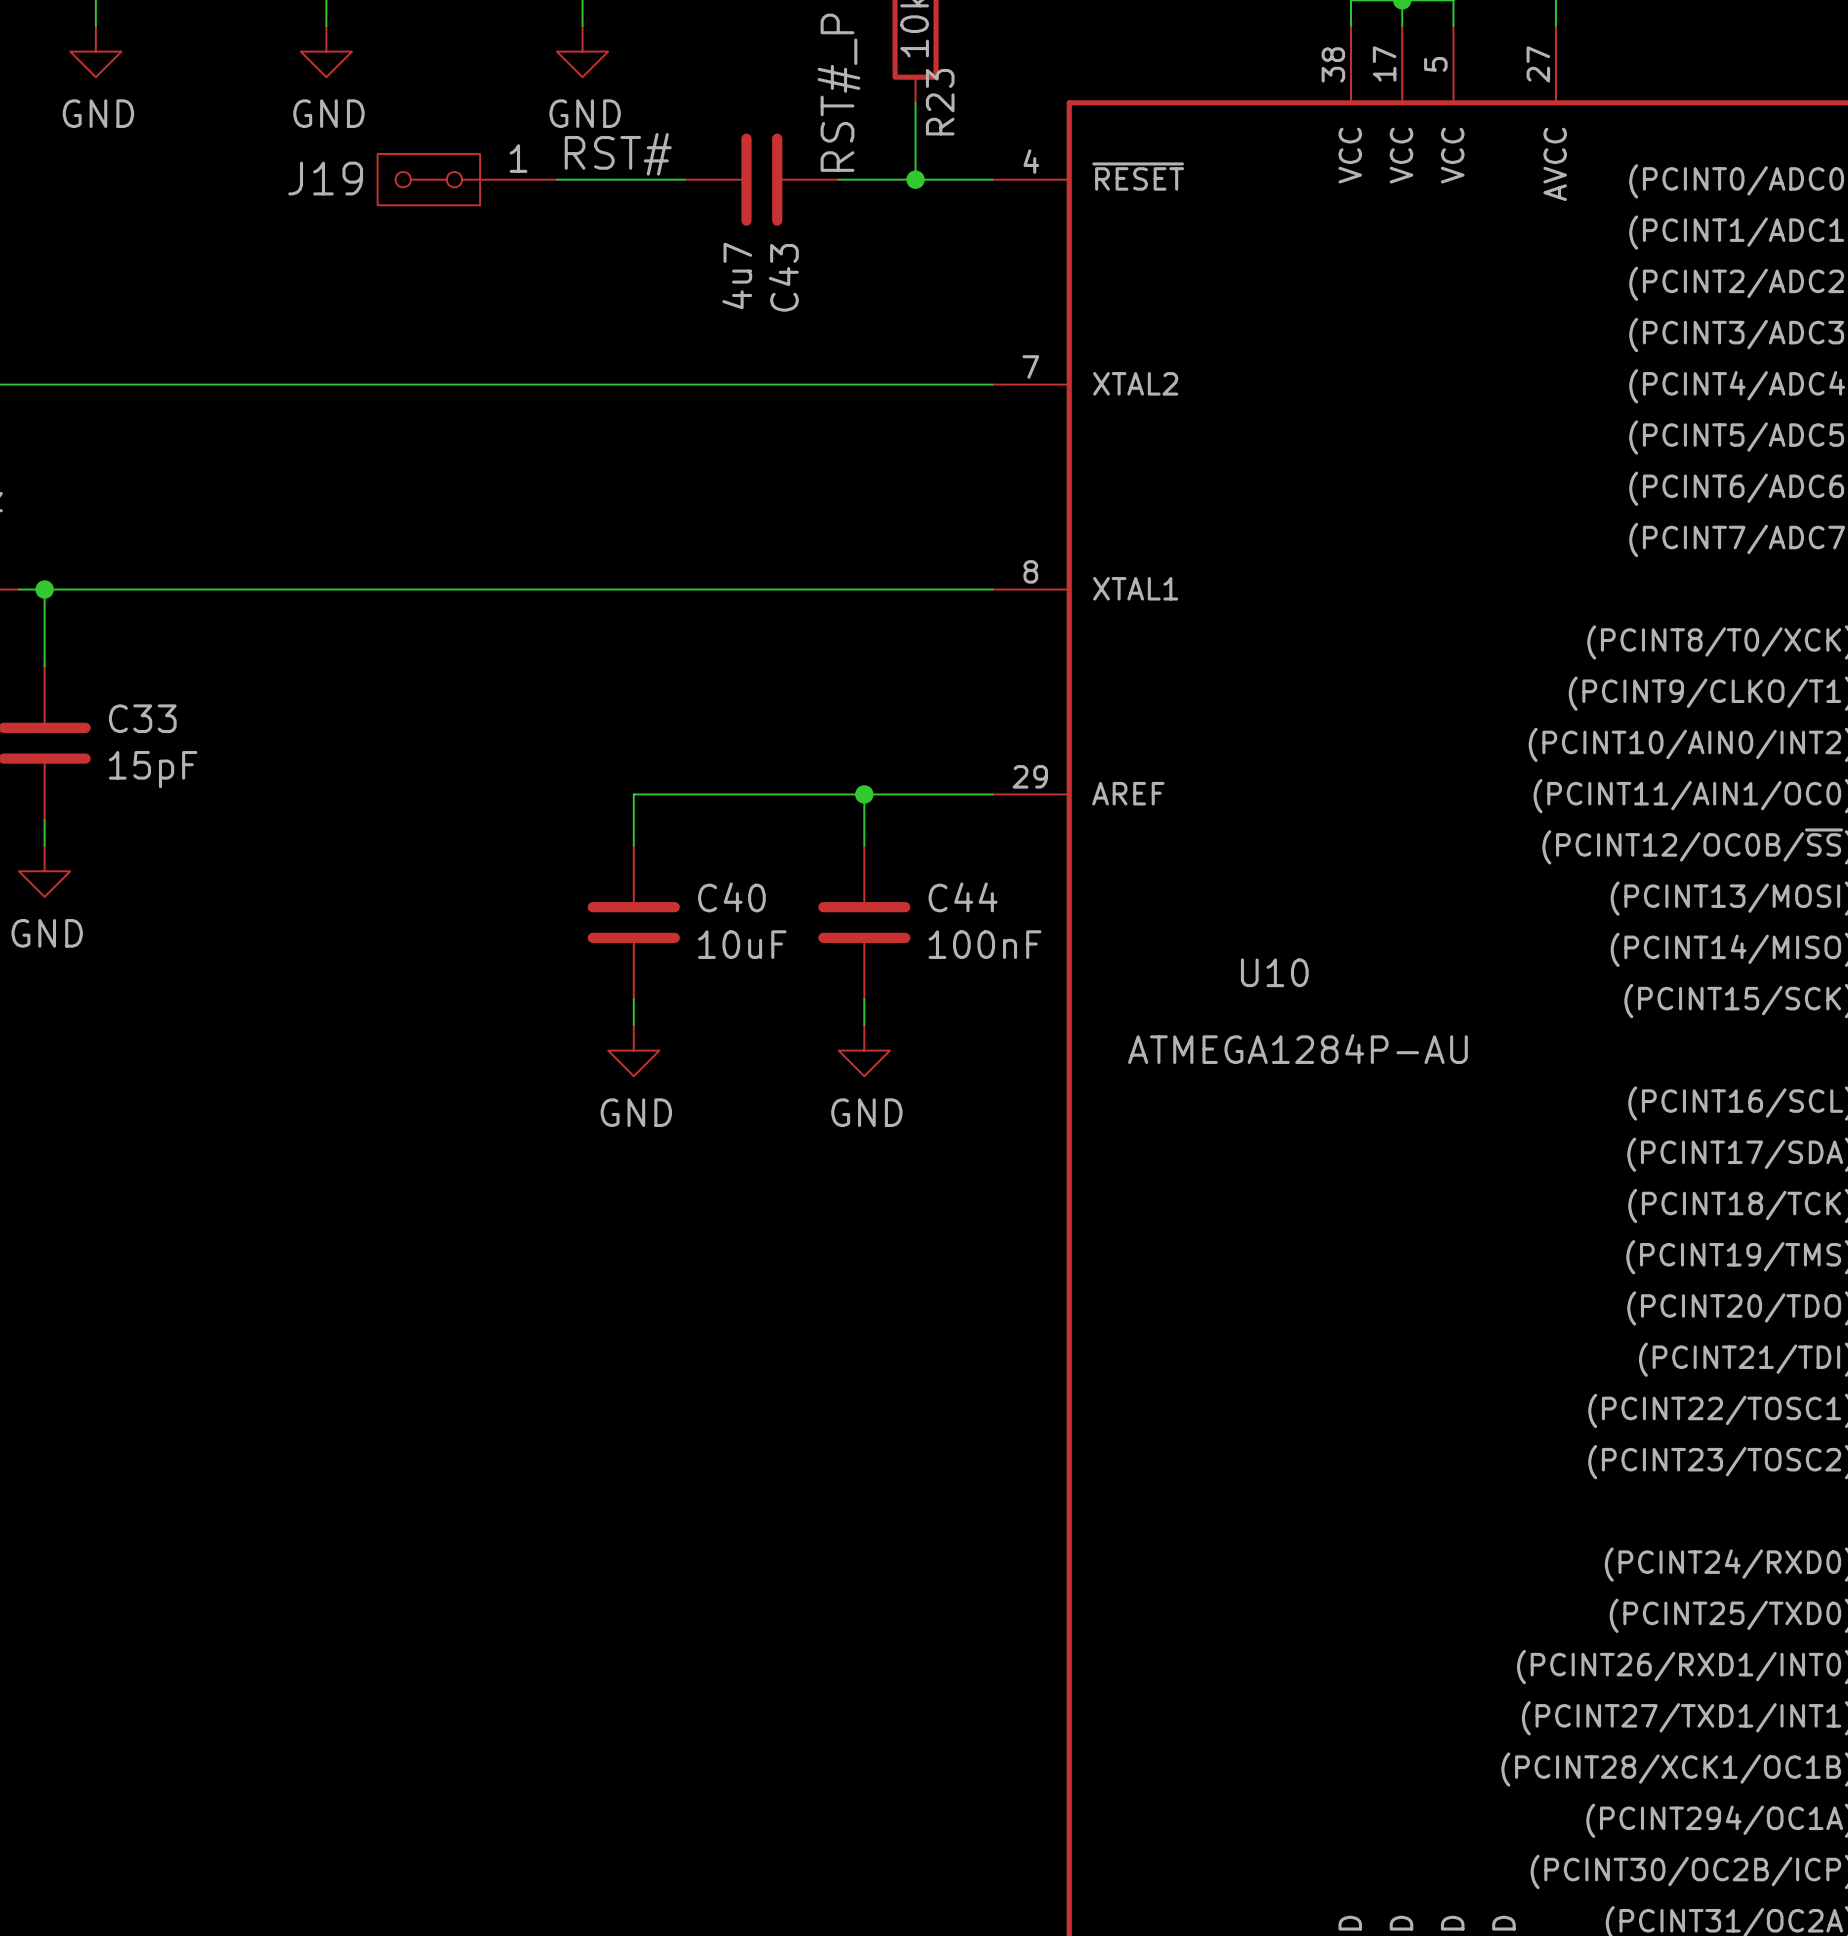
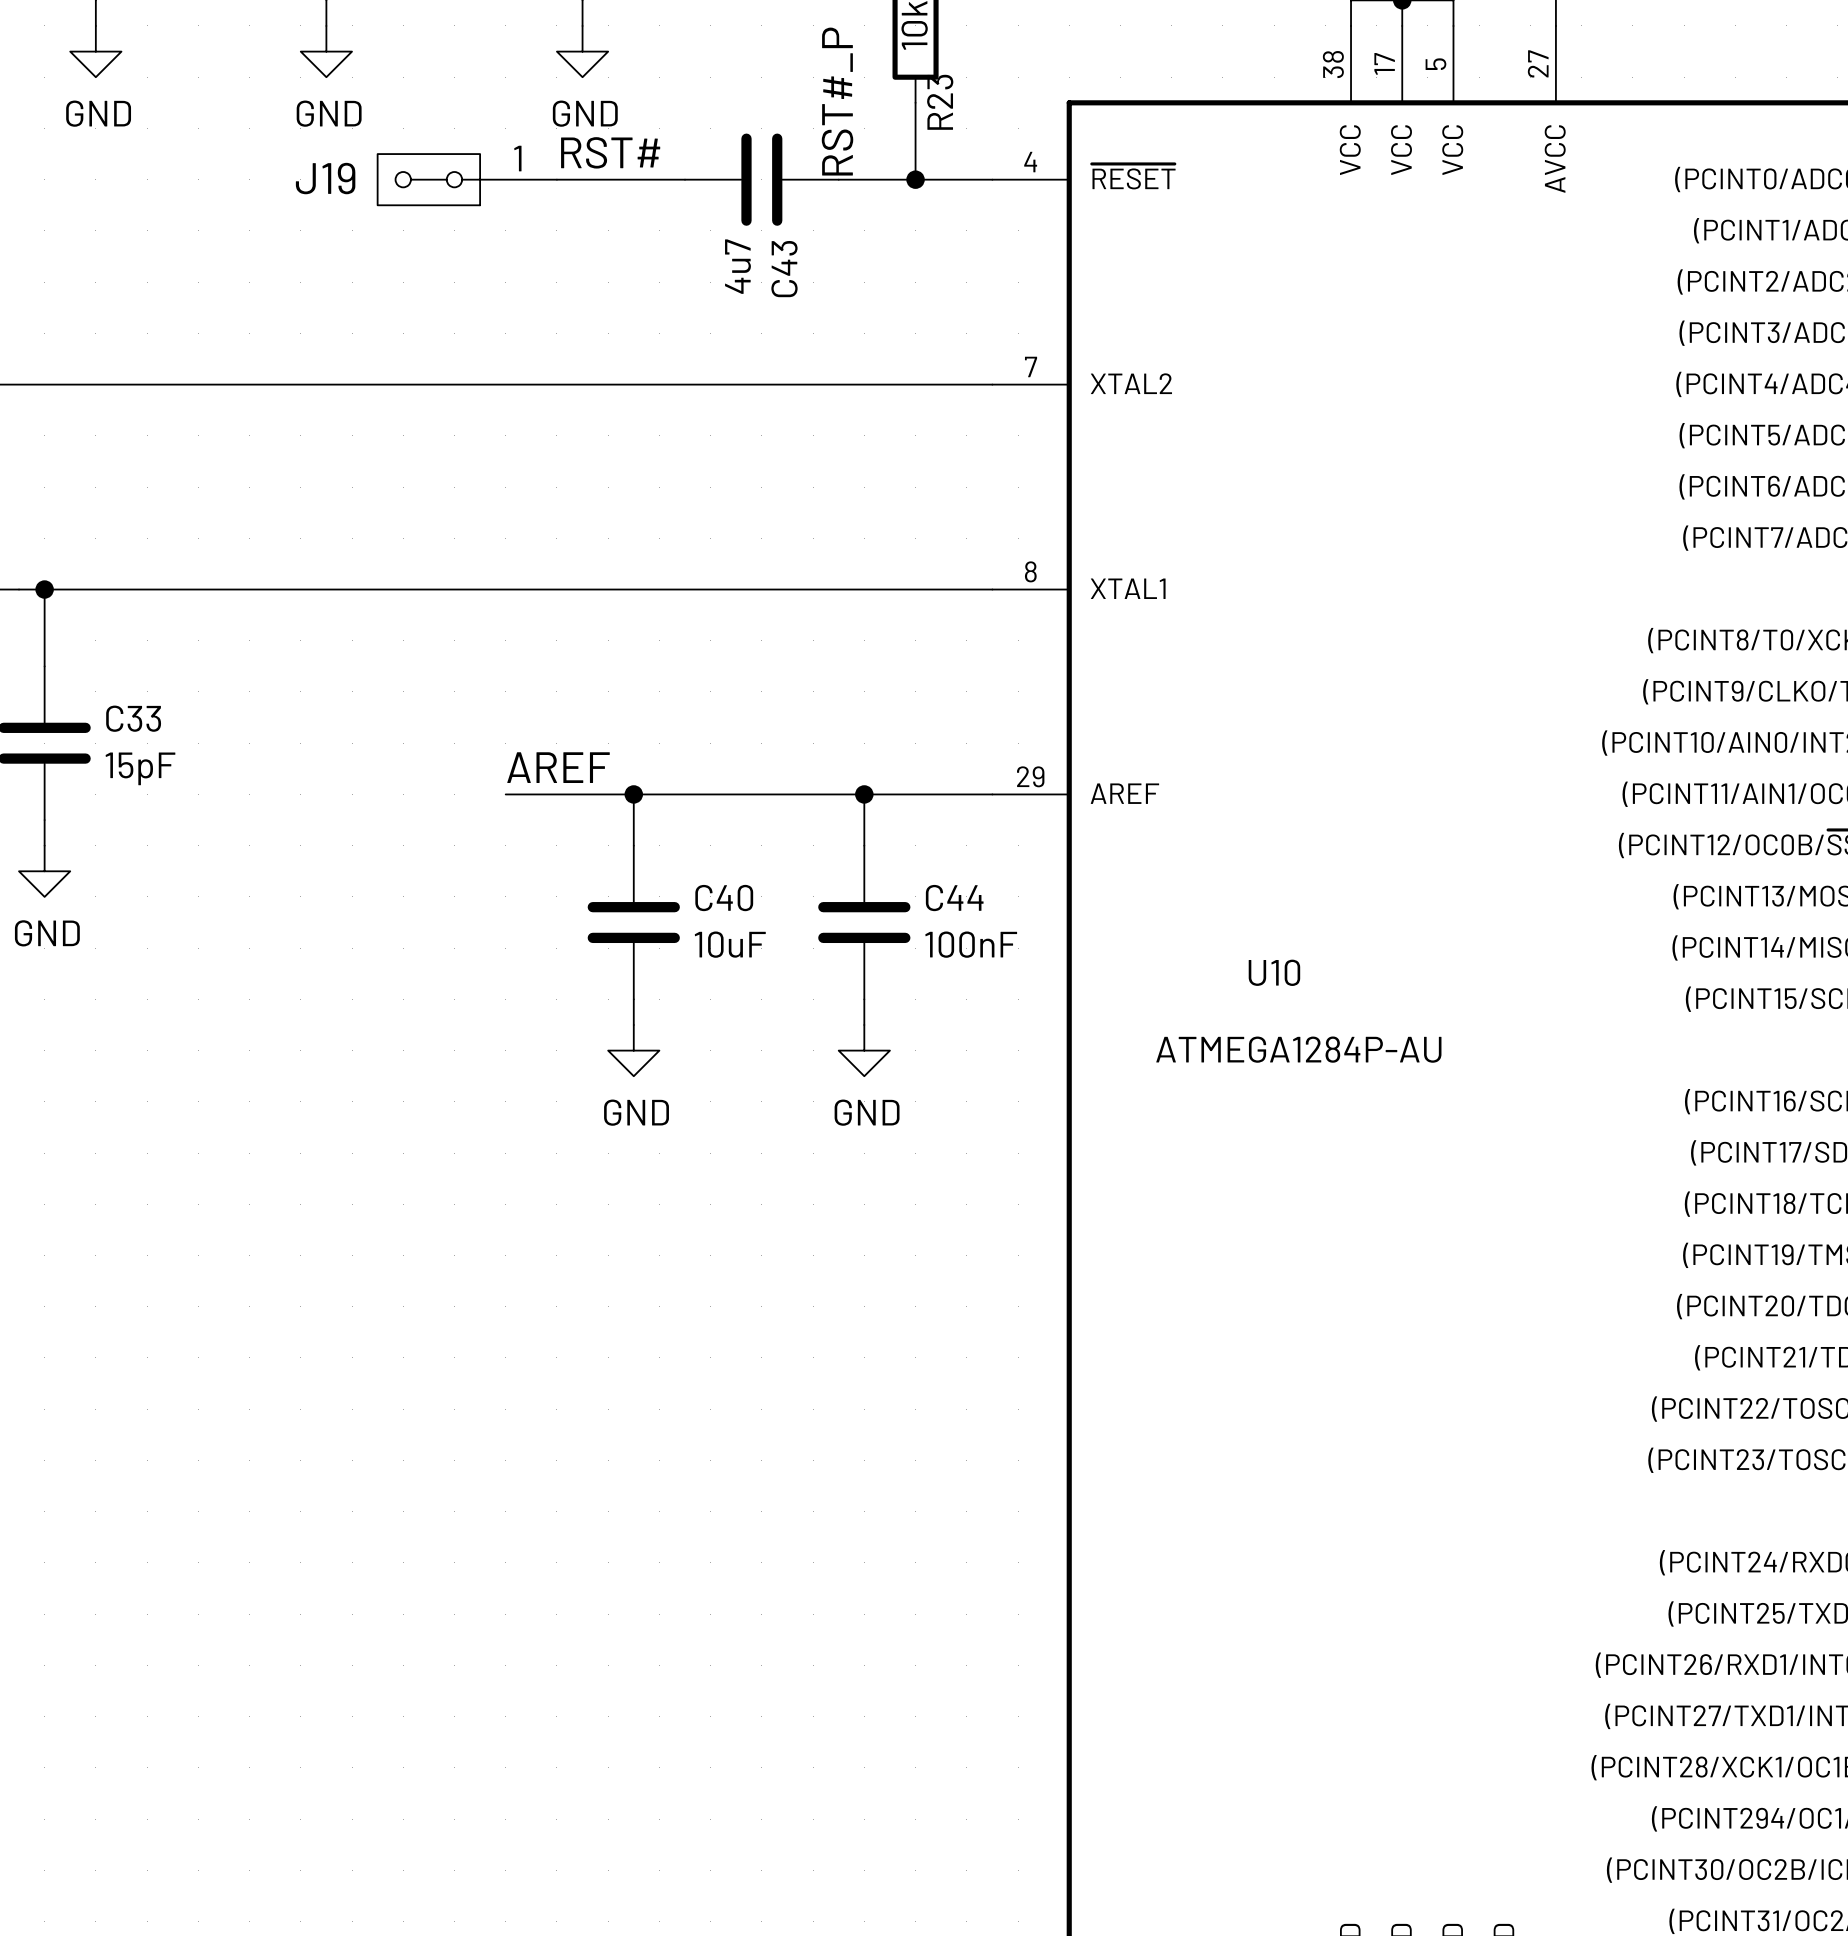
label: none -> AREF (558, 767)
wire: none -> (505, 794) (633, 794)
junction: none -> (633, 794)

